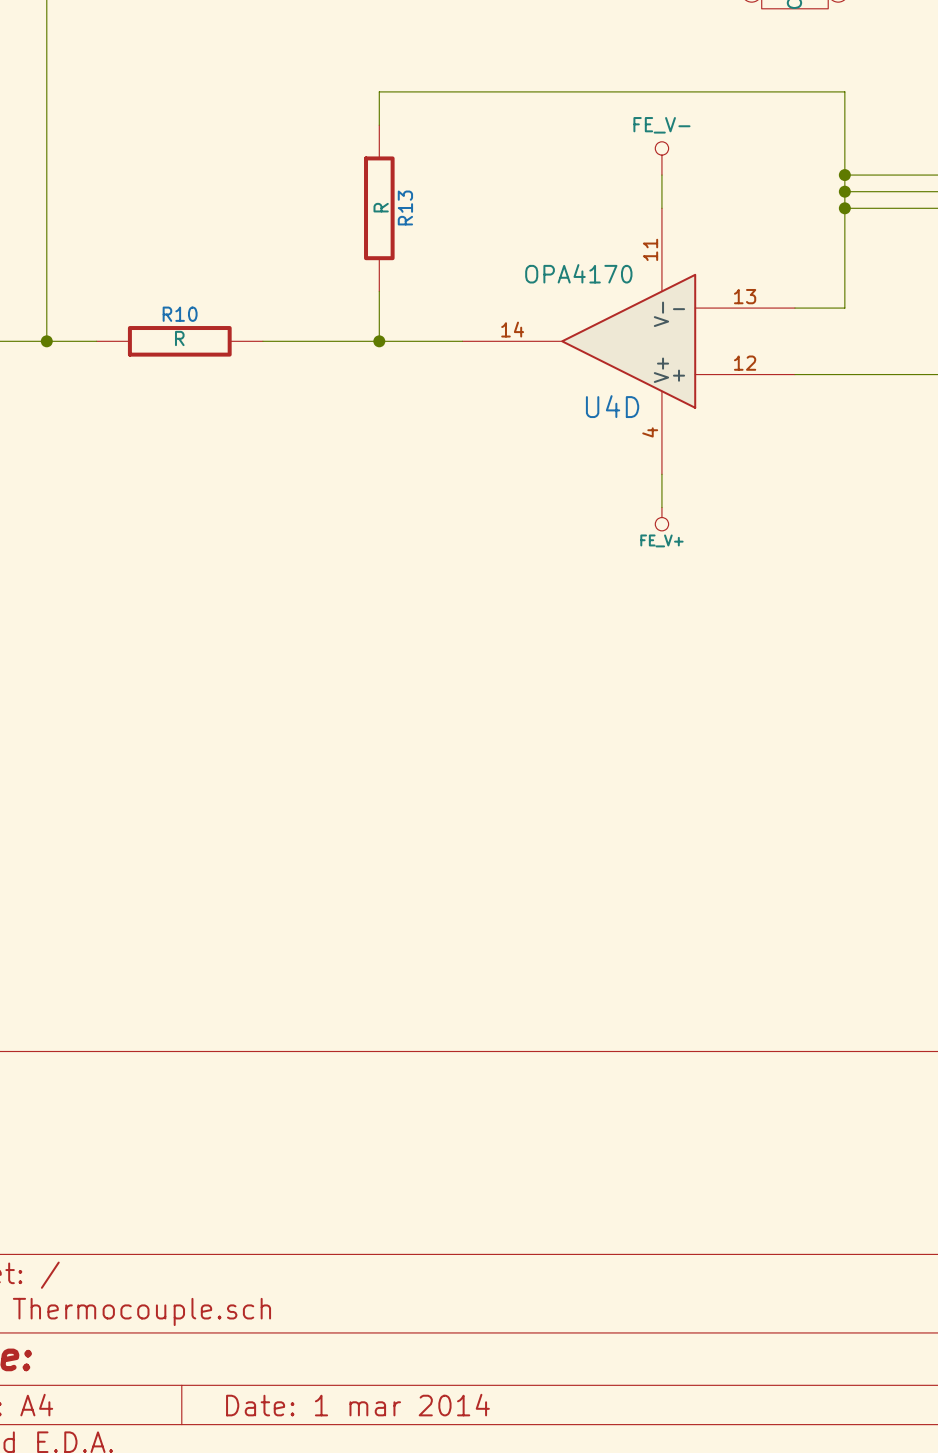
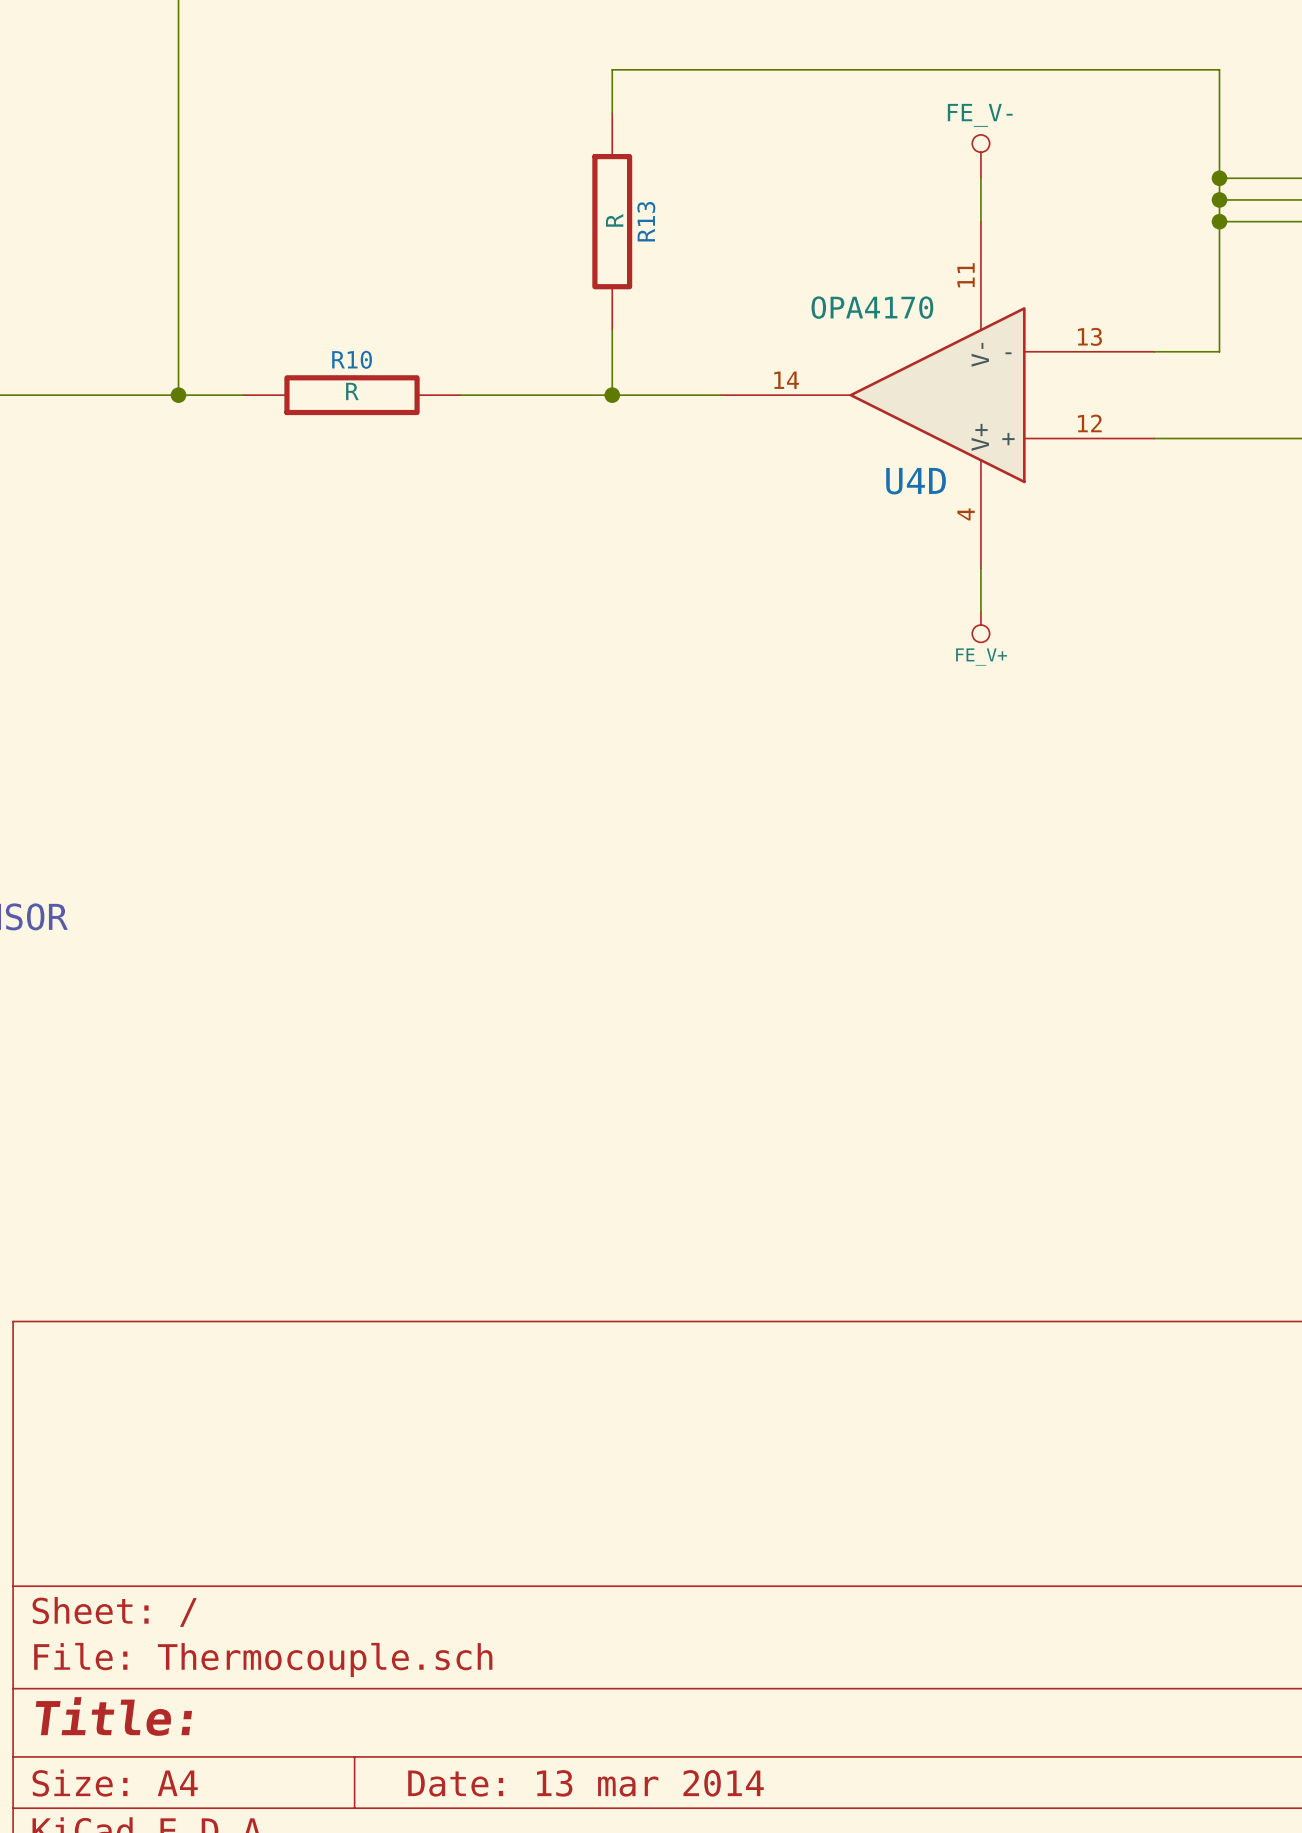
title block: Date: 1 mar 2014 (357, 1405) -> Date: 13 mar 2014 (585, 1783)

